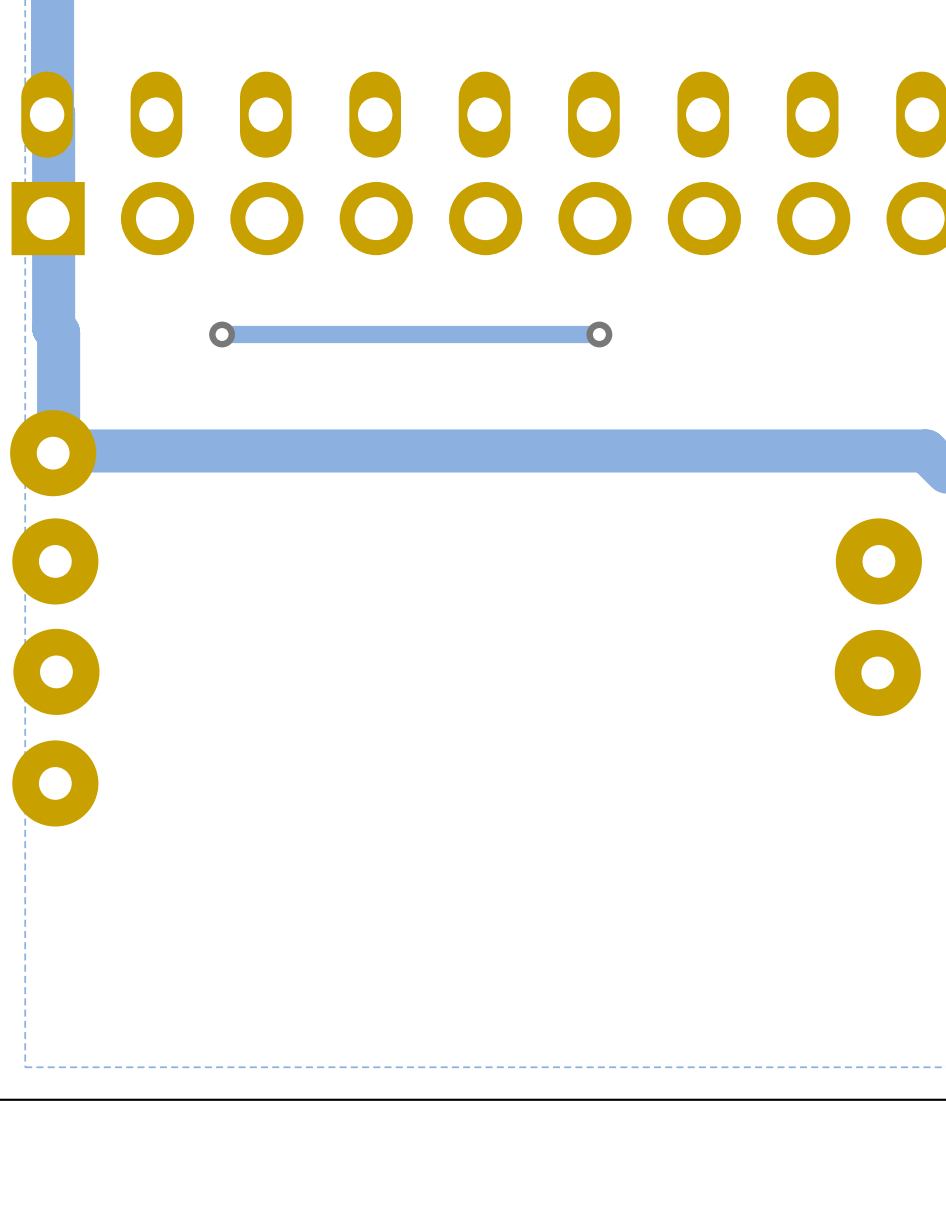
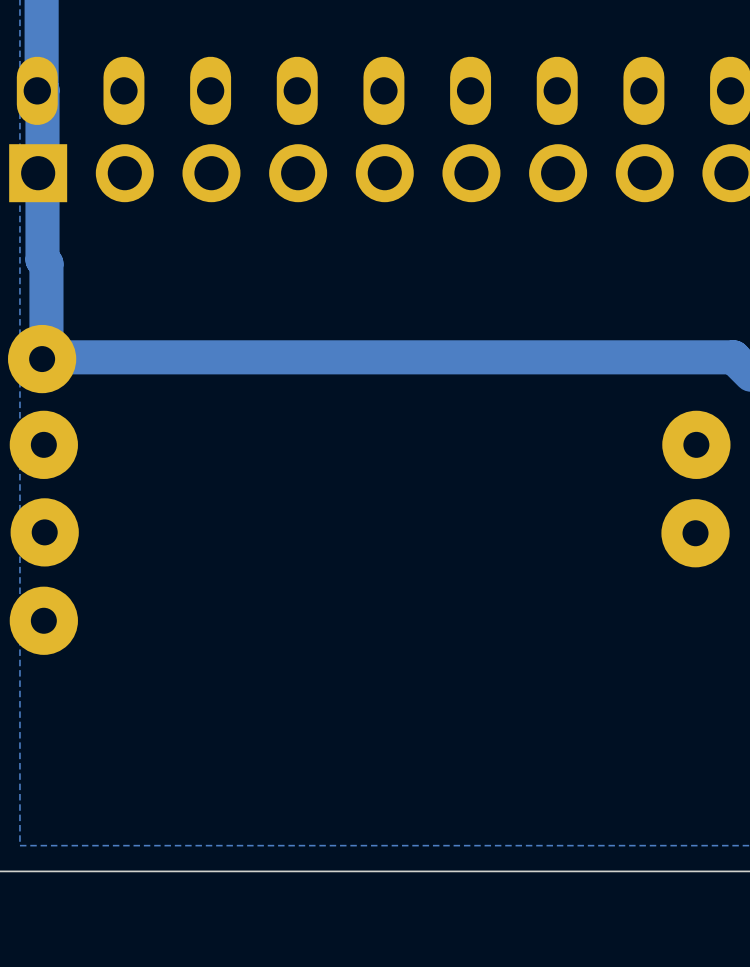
via: (222, 334) -> none
track: (599, 334) (222, 334) -> none
via: (599, 334) -> none

